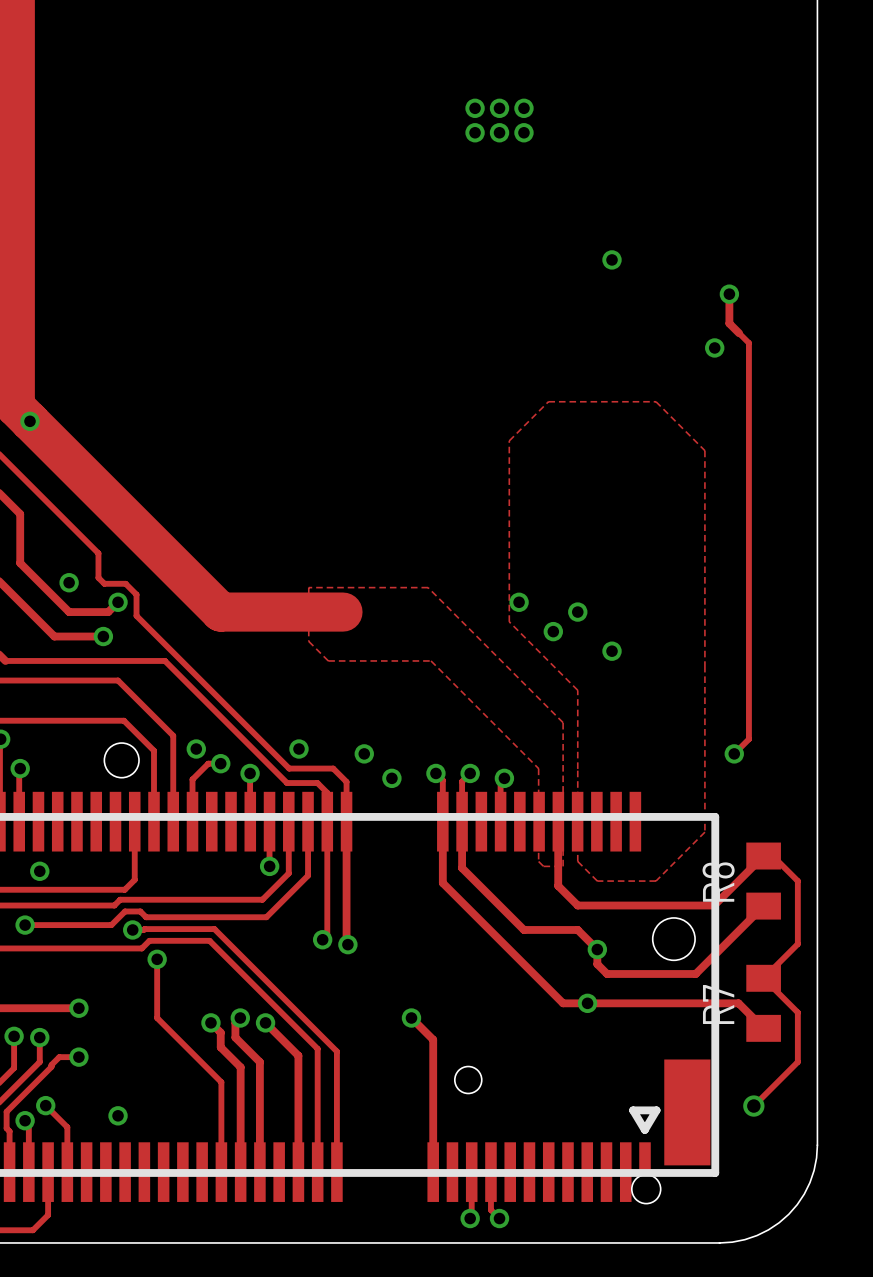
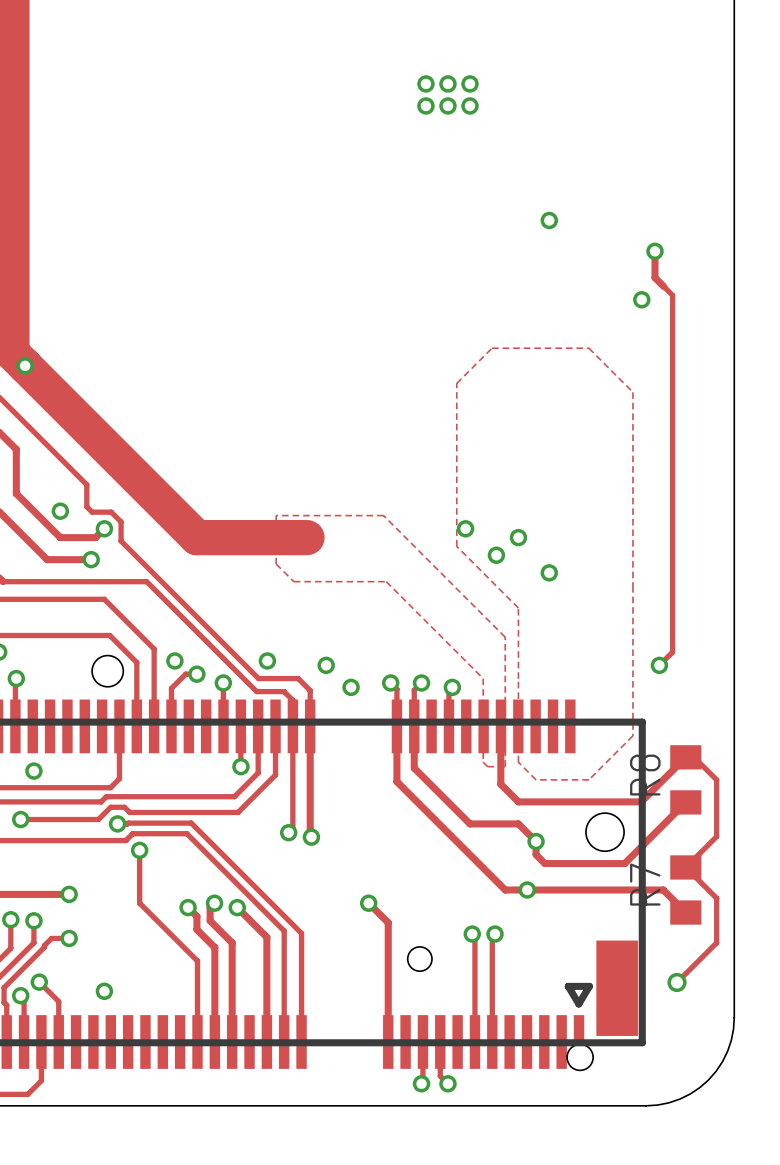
track: none -> (472, 934) (474, 936) (474, 1042)
via: none -> (472, 934)
track: none -> (495, 934) (492, 936) (492, 1042)
via: none -> (495, 934)

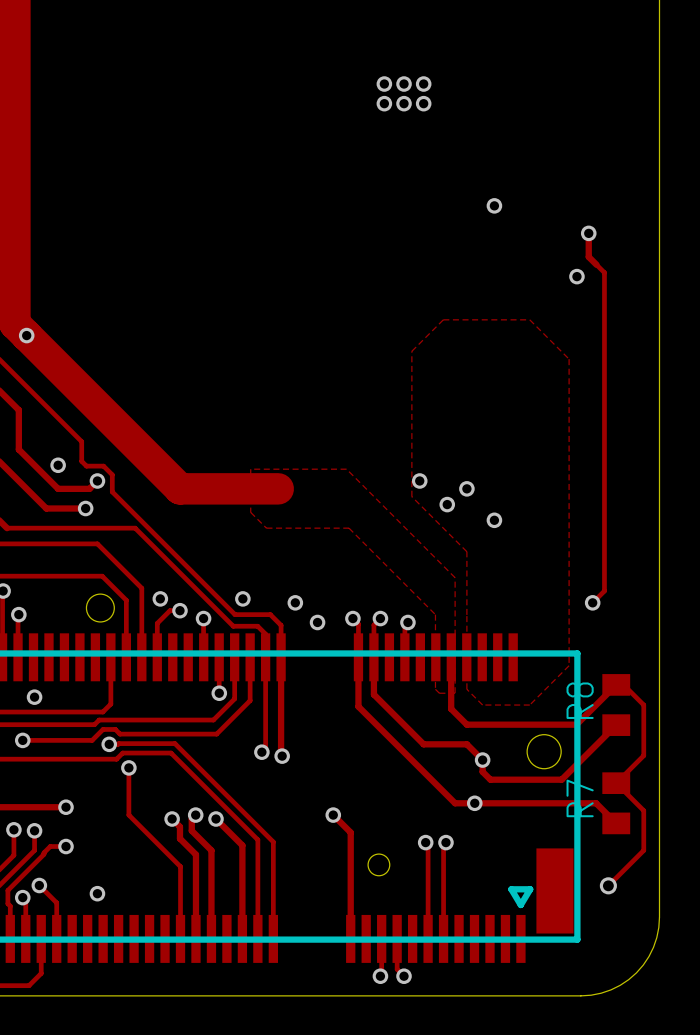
part: (580, 1057) -> none

